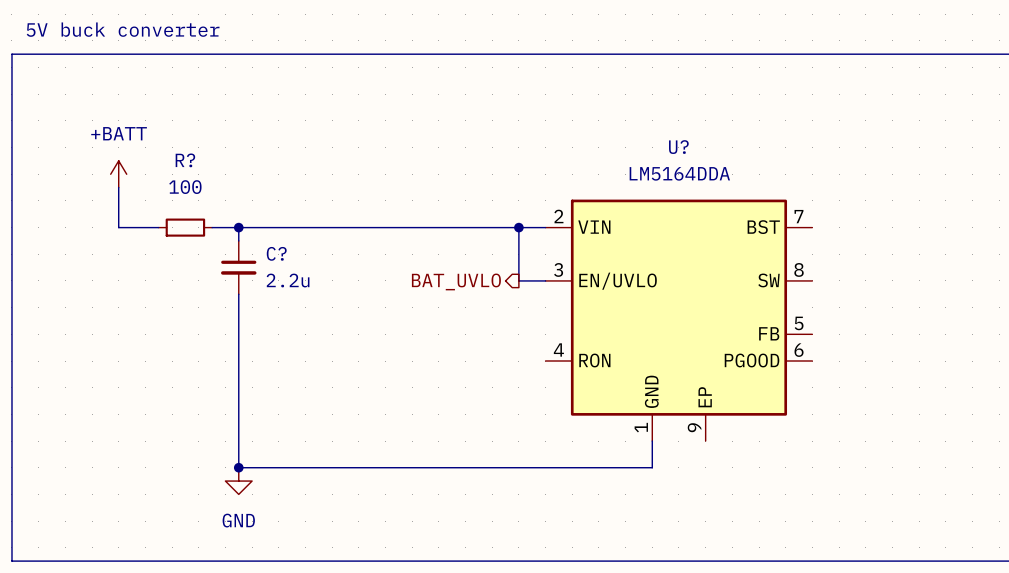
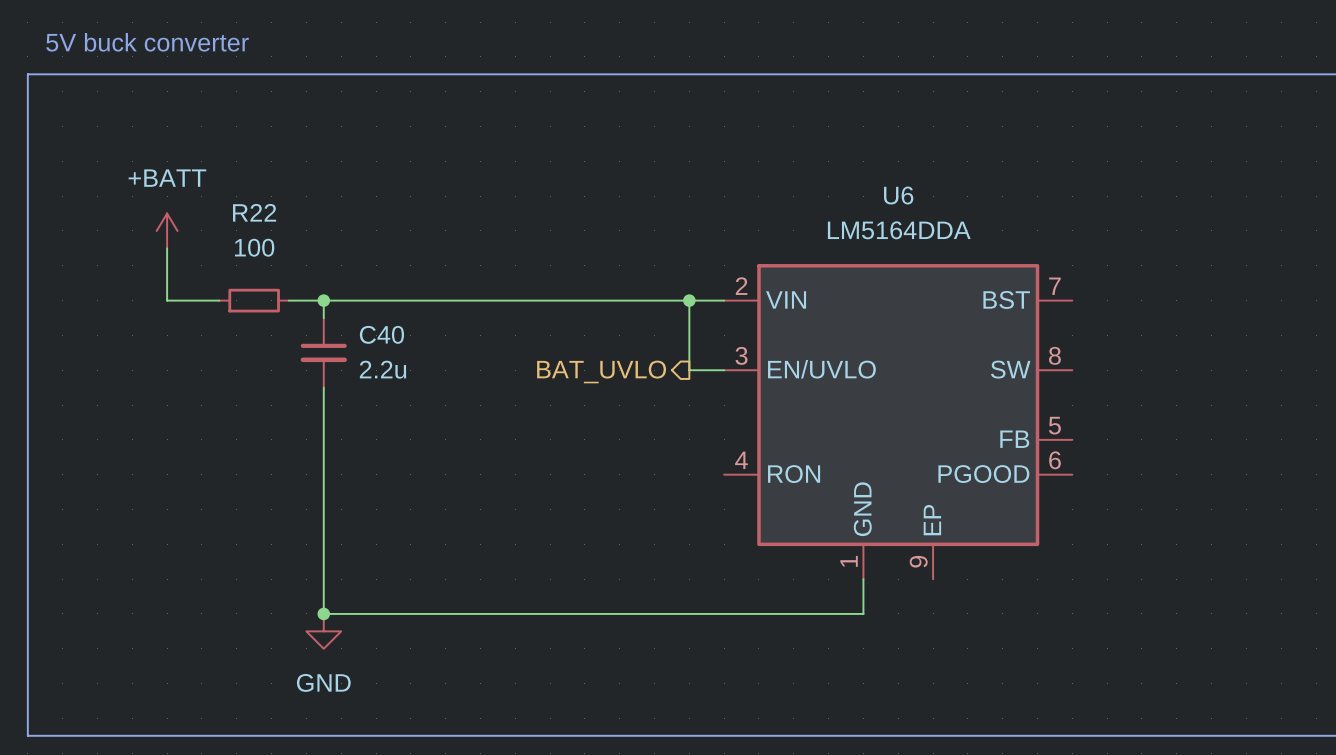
U? name: U? (678, 147) -> U6 (898, 195)
R? name: R? (185, 160) -> R22 (254, 212)
C? name: C? (276, 253) -> C40 (381, 334)

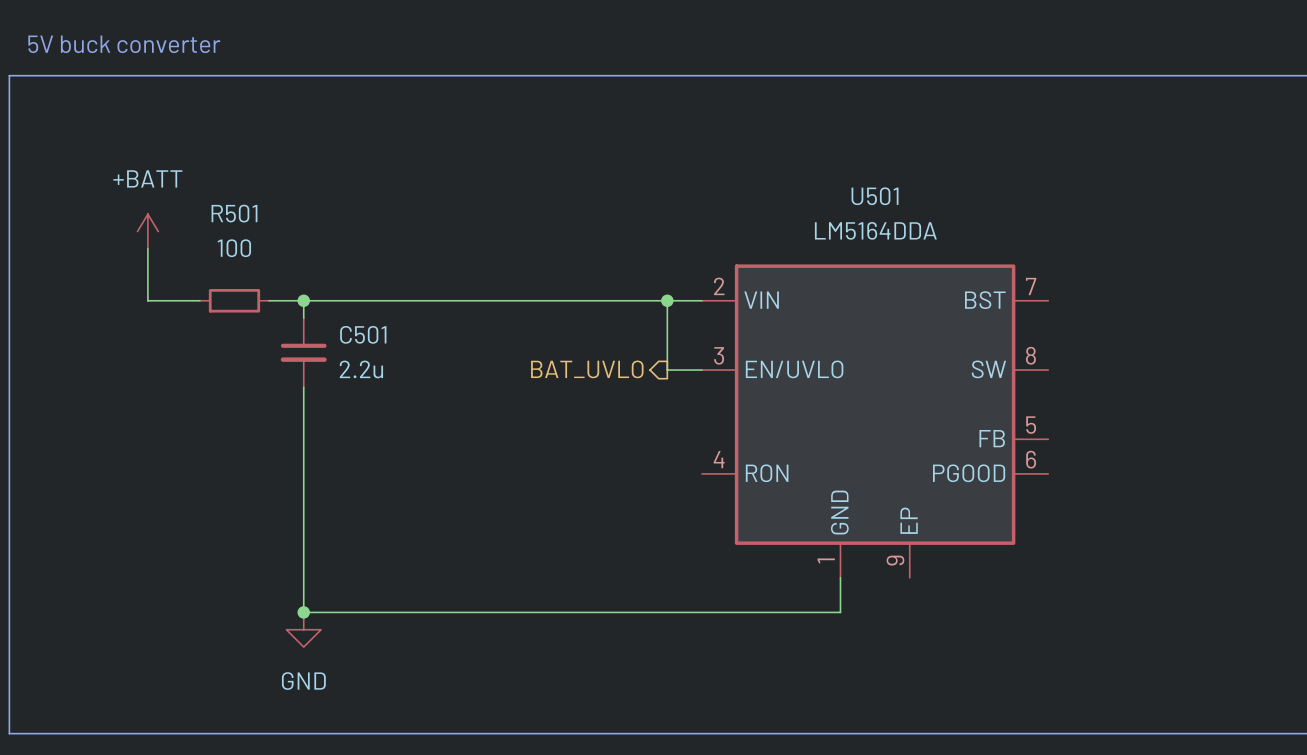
U6 name: U6 (898, 195) -> U501 (875, 196)
R22 name: R22 (254, 212) -> R501 (234, 213)
C40 name: C40 (381, 334) -> C501 (363, 334)

